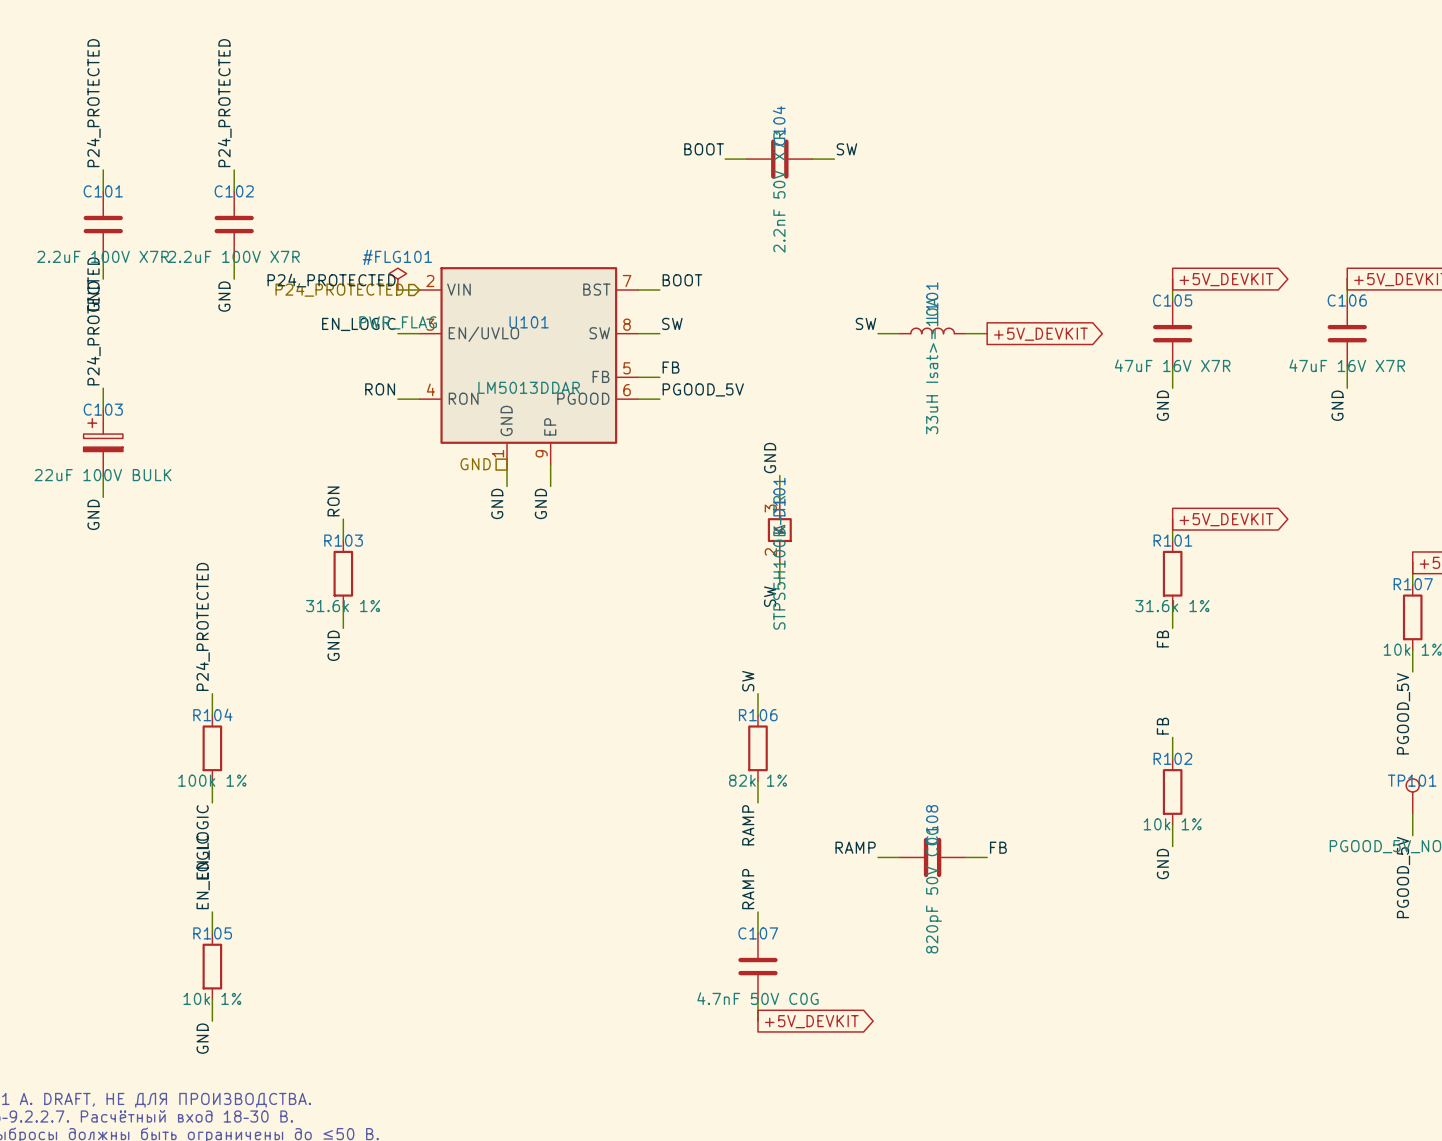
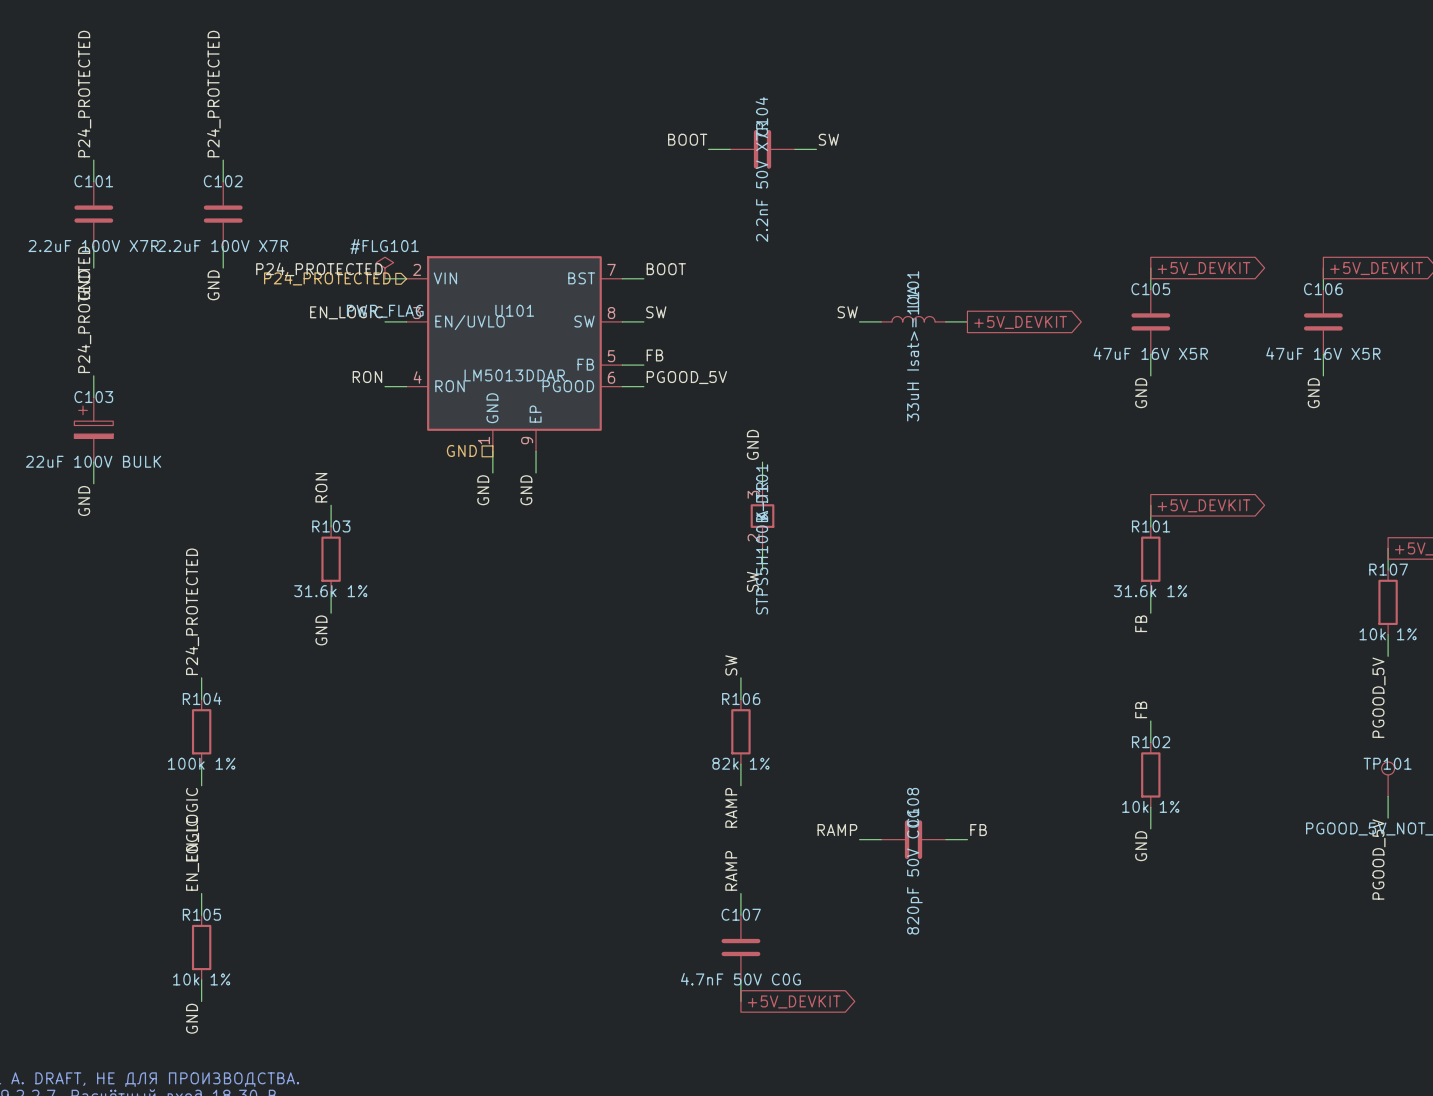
C105 value: 47uF 16V X7R (1172, 365) -> 47uF 16V X5R (1150, 353)
C106 value: 47uF 16V X7R (1347, 365) -> 47uF 16V X5R (1323, 353)

